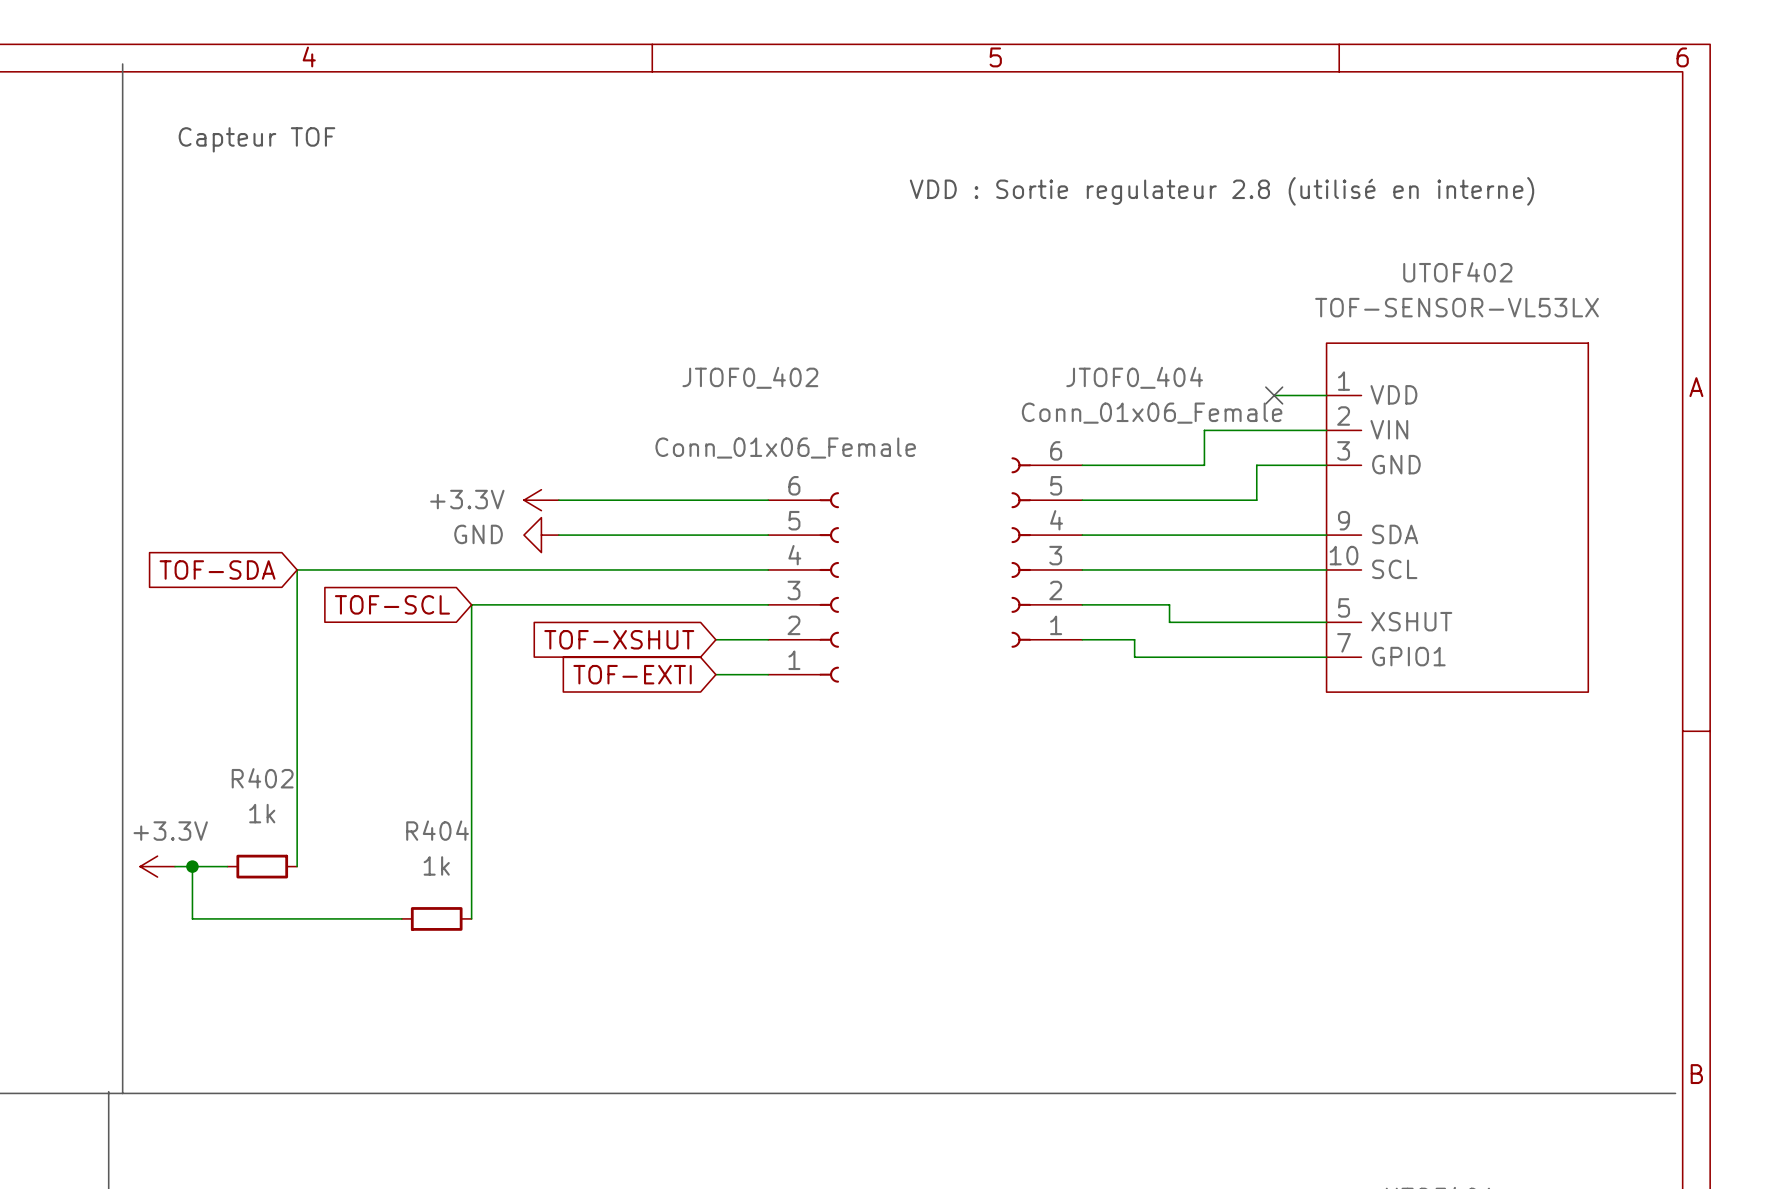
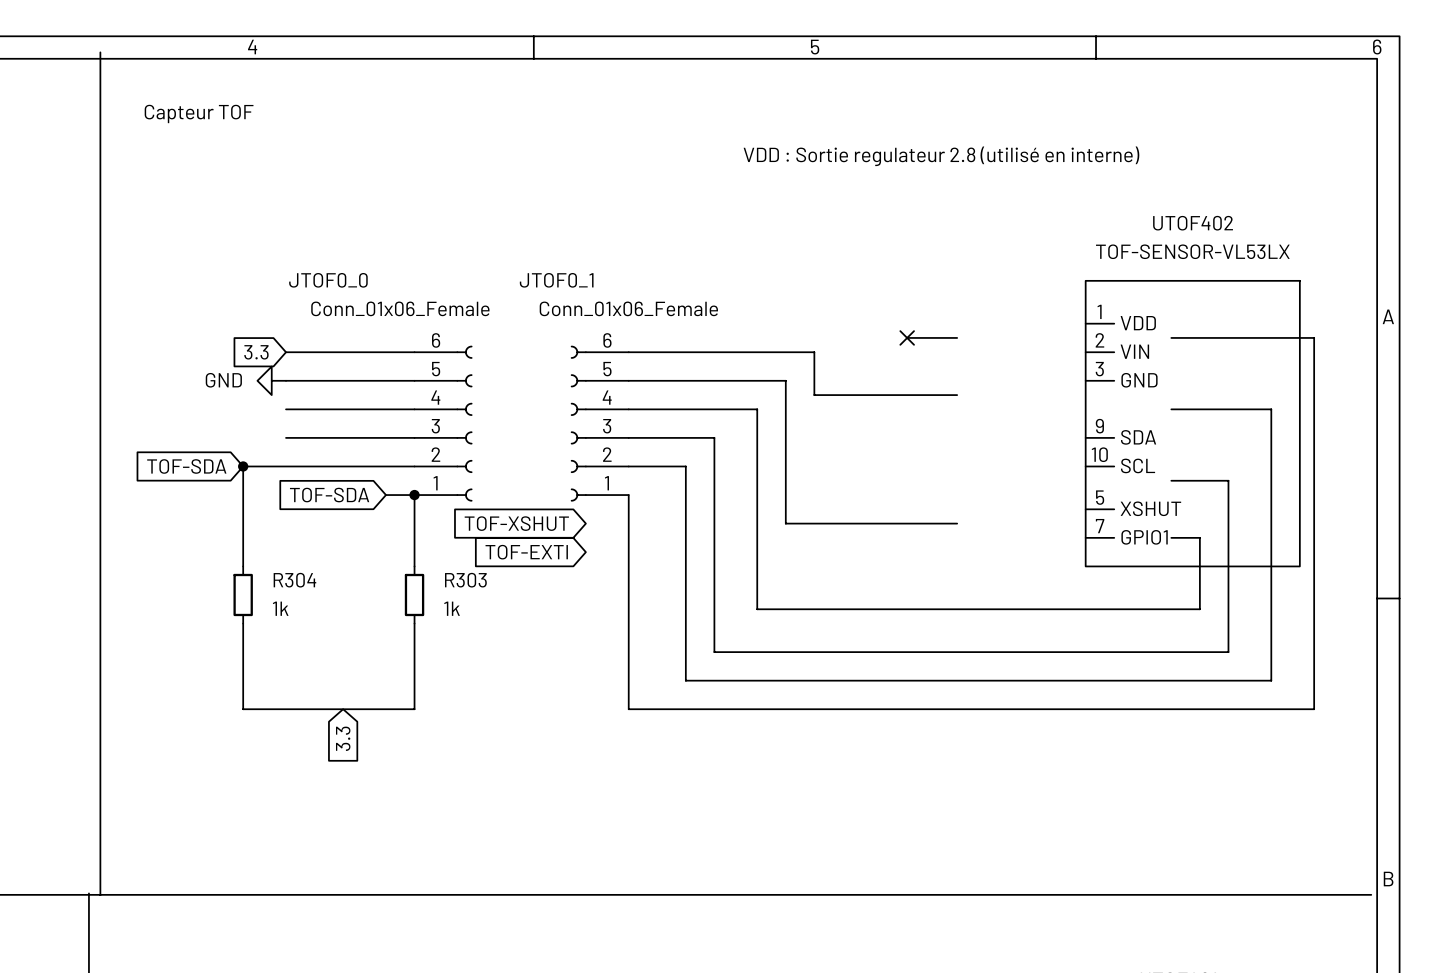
wire: (1274, 395) (1326, 395) -> none
no-connect mark: (1274, 395) -> none
wire: none -> (907, 337) (957, 337)
no-connect mark: none -> (907, 337)
wire: none -> (1171, 337) (1314, 337) (1314, 709) (628, 709) (628, 495)
global label: none -> 3.3 (256, 352)
wire: none -> (286, 352) (414, 352)
wire: none -> (628, 352) (814, 352) (814, 395) (957, 395)
wire: (1326, 430) (1204, 430) (1204, 465) (1082, 465) -> none
wire: none -> (286, 380) (414, 380)
wire: none -> (628, 380) (785, 380) (785, 523) (885, 523)
wire: (1326, 465) (1256, 465) (1256, 500) (1082, 500) -> none
wire: none -> (286, 409) (414, 409)
power symbol: +3.3V (541, 500) -> none
wire: (558, 500) (768, 500) -> (1171, 537) (1199, 537) (1199, 609) (757, 609) (757, 409) (628, 409)
JTOF0_0: none -> Conn_01x06_Female (443, 423)
JTOF0_1: none -> Conn_01x06_Female (599, 423)
wire: none -> (286, 437) (414, 437)
power symbol position: GND (541, 535) -> GND (271, 380)
wire: (558, 535) (768, 535) -> (1171, 480) (1228, 480) (1228, 652) (714, 652) (714, 437) (628, 437)
wire: (1082, 535) (1326, 535) -> none
JTOF0_404: Conn_01x06_Female (1046, 552) -> none
junction: none -> (243, 466)
wire: (506, 569) (768, 569) -> (1171, 409) (1271, 409) (1271, 680) (685, 680) (685, 466) (628, 466)
wire: (1082, 569) (1326, 569) -> none
JTOF0_402: Conn_01x06_Female (803, 587) -> none
global label: TOF-SCL (392, 604) -> TOF-SDA (329, 495)
wire: (471, 604) (471, 918) -> none
wire: (506, 604) (768, 604) -> (414, 495) (414, 566)
junction: none -> (414, 495)
wire: (1082, 604) (1169, 604) (1169, 622) (1326, 622) -> none
wire: (715, 639) (768, 639) -> none
wire: (1134, 639) (1134, 657) (1326, 657) -> (928, 523) (957, 523)
wire: (715, 674) (768, 674) -> none
wire: (297, 692) (297, 761) -> none
R304: none -> 1k (243, 594)
R303: none -> 1k (414, 594)
wire: none -> (414, 623) (414, 709) (243, 709)
power symbol: +3.3V (157, 866) -> none
wire: (175, 866) (227, 866) -> none
wire: (192, 866) (192, 918) (401, 918) -> none
junction: (192, 866) -> none
R402: 1k (262, 866) -> none
global label: none -> 3.3 (343, 738)
R404: 1k (436, 918) -> none

